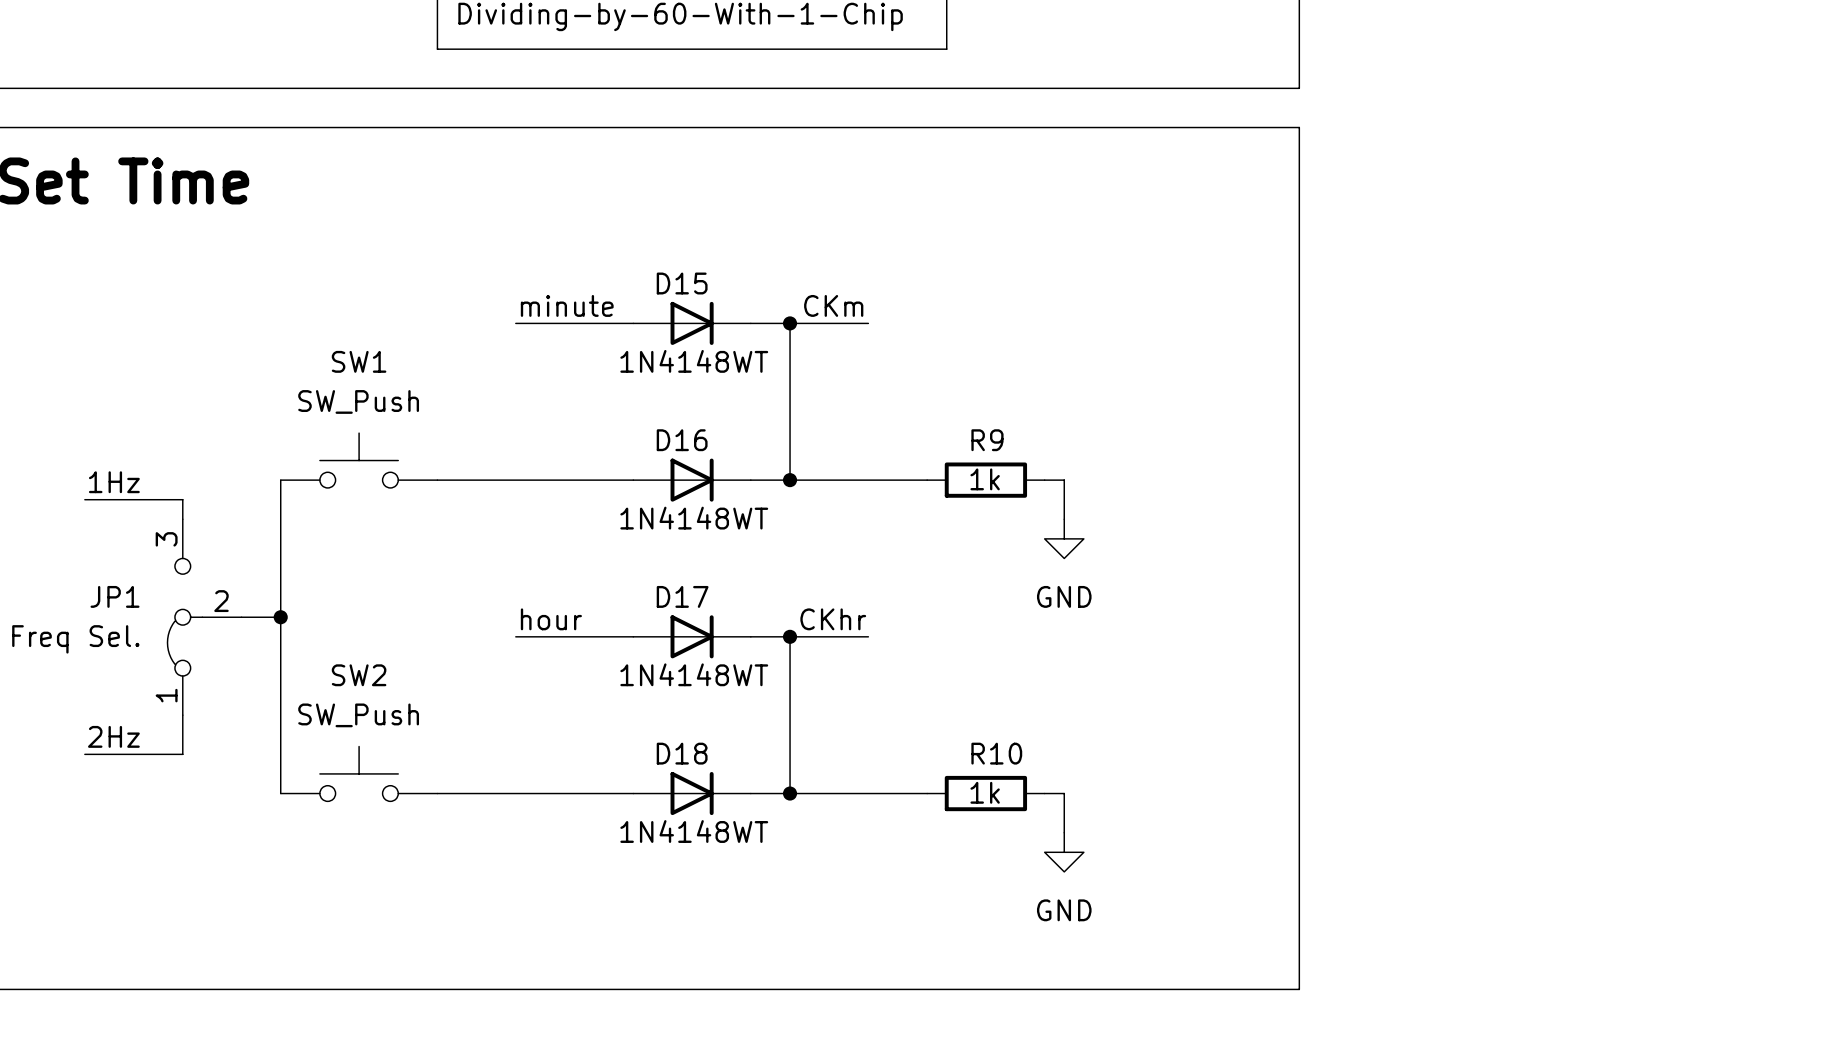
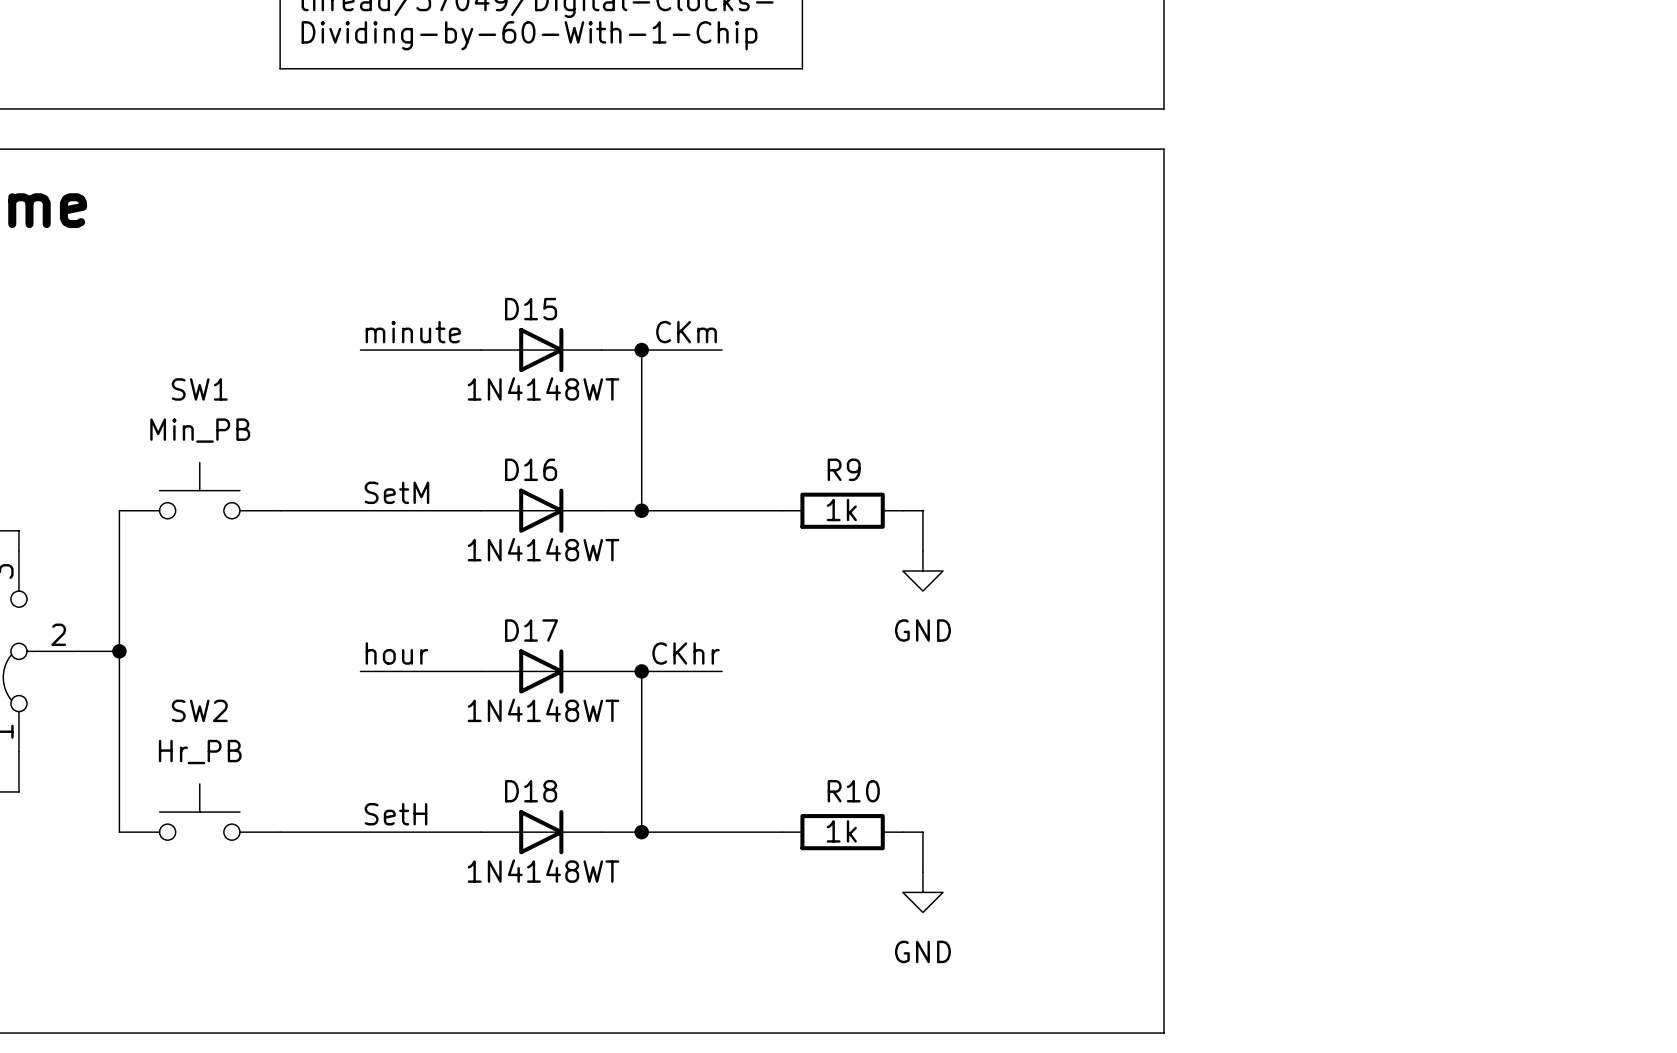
SW1 value: SW_Push (358, 401) -> Min_PB (200, 430)
label: none -> SetM (396, 492)
SW2 value: SW_Push (358, 715) -> Hr_PB (200, 752)
label: none -> SetH (396, 814)

